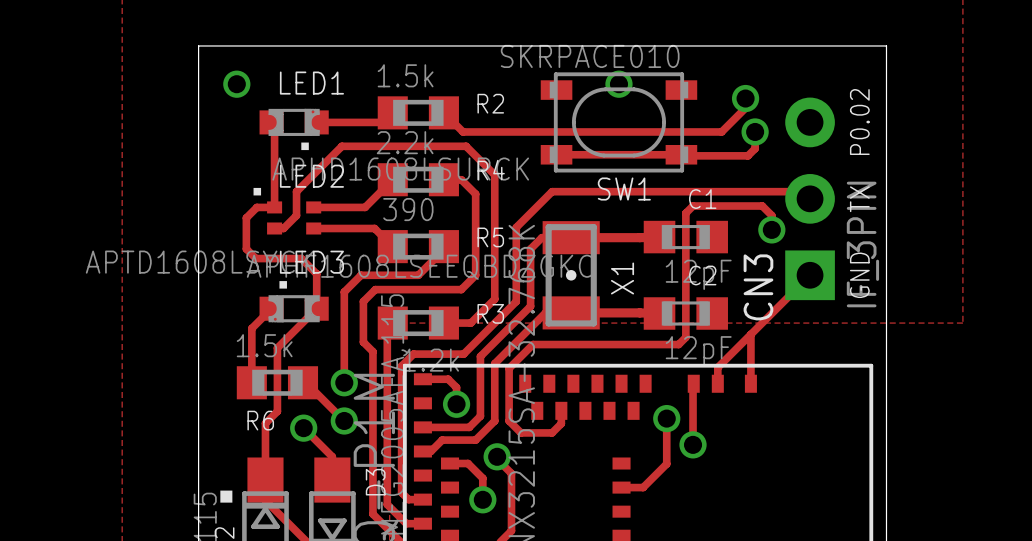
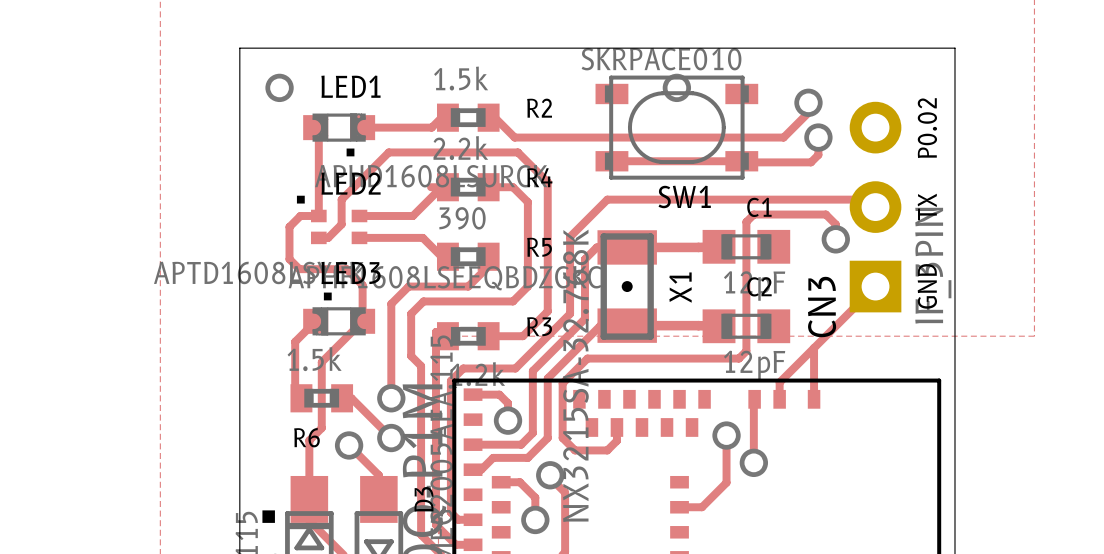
R2 footprint: [377, 96, 459, 130] -> [436, 103, 500, 132]
R4 footprint: [377, 163, 459, 197] -> [436, 173, 500, 202]
R5 footprint: [377, 230, 459, 264] -> [436, 242, 500, 271]
R3 footprint: [377, 306, 459, 340] -> [436, 322, 500, 351]
R6 footprint: [236, 366, 319, 400] -> [290, 384, 354, 413]

